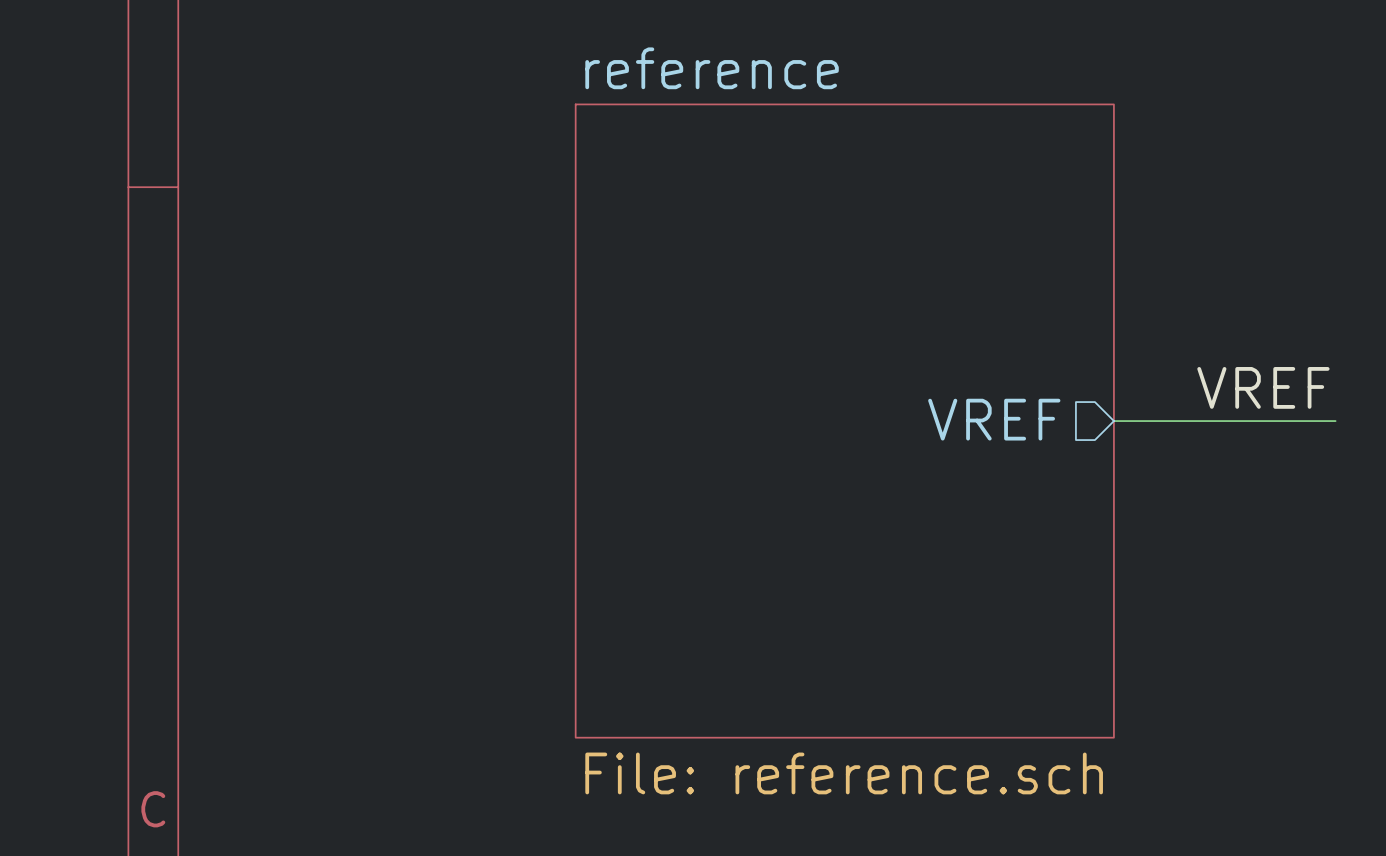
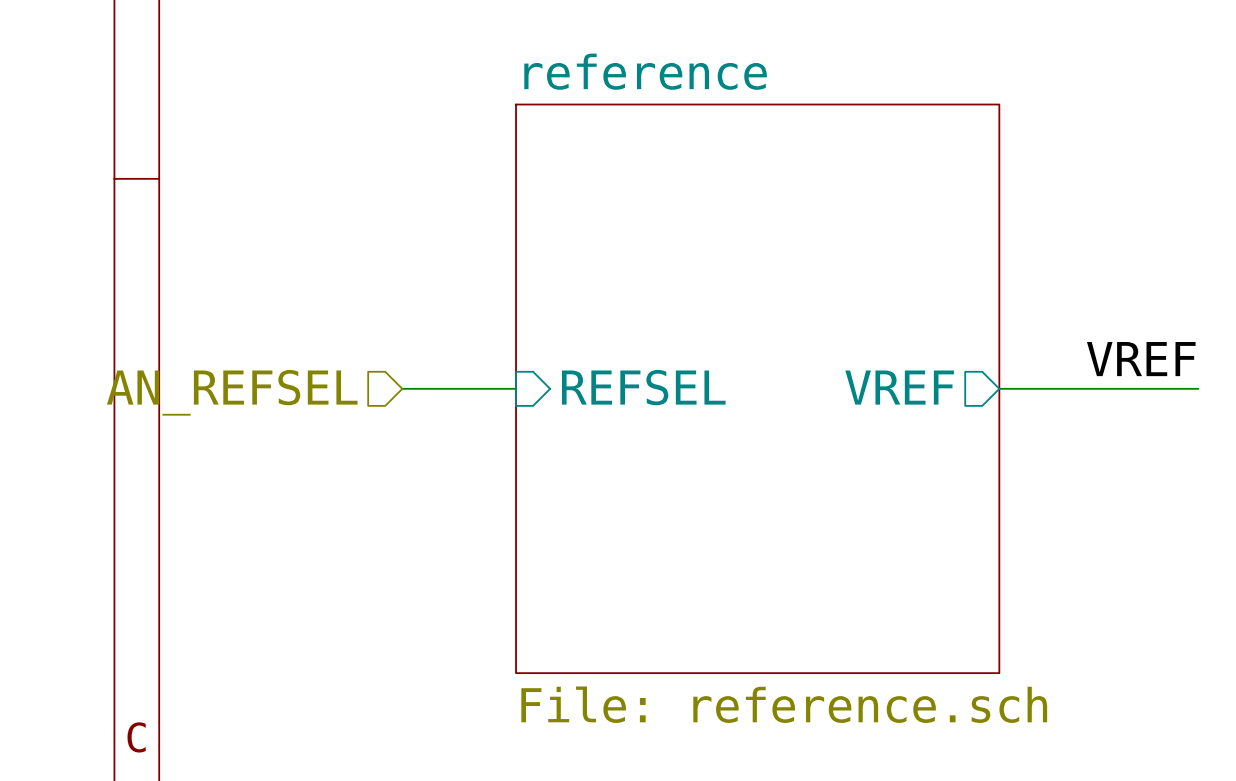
sheet pin: none -> REFSEL (643, 387)
hierarchical label: none -> AN_REFSEL (232, 392)
wire: none -> (402, 388) (516, 388)

